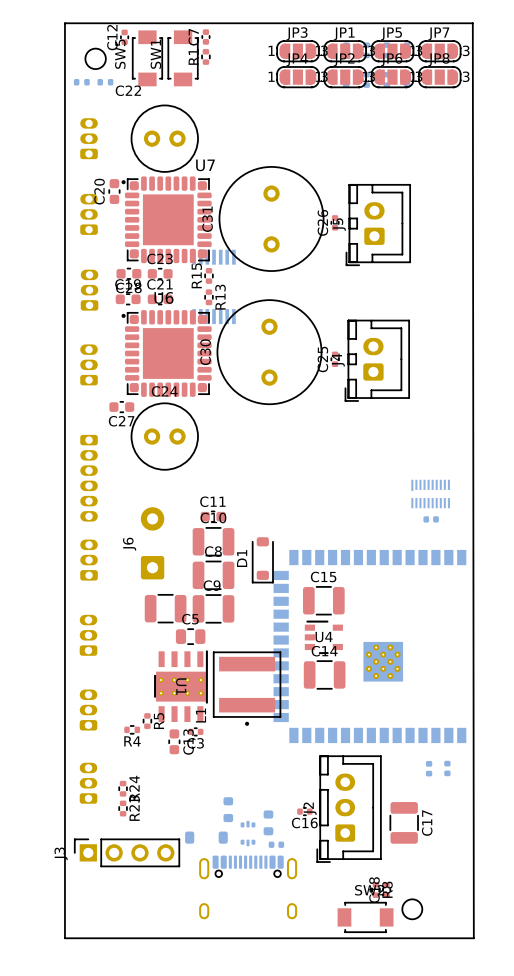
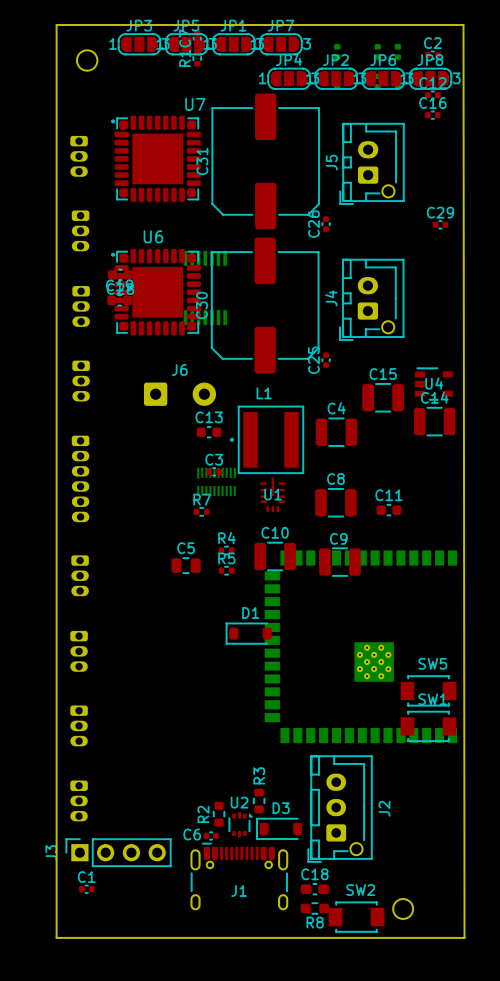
C12 rotation: 0° (124, 37) -> 90° clockwise (432, 95)
C12 position: (124, 37) -> (432, 95)
part: (366, 50) -> none
JP3 position: (297, 51) -> (139, 44)
JP1 position: (345, 51) -> (233, 44)
JP5 position: (392, 51) -> (186, 44)
JP7 position: (439, 51) -> (280, 44)
C2: none -> (432, 55)
SW5 rotation: 0° (147, 58) -> 90° clockwise (428, 690)
SW5 position: (147, 58) -> (428, 690)
SW1 rotation: 0° (183, 58) -> 90° clockwise (428, 726)
SW1 position: (183, 58) -> (428, 726)
part: (366, 79) -> none
part: (81, 82) -> none
part: (105, 82) -> none
part rotation: 0° (89, 138) -> 180° (79, 156)
C22: (164, 138) -> none
C31 footprint: [218, 166, 325, 272] -> [211, 93, 320, 230]
J5 footprint: [345, 184, 411, 266] -> [339, 123, 405, 205]
C20: (114, 191) -> none
part rotation: 0° (89, 214) -> 180° (80, 230)
U7 position: (166, 219) -> (155, 158)
C29: none -> (440, 224)
C23: (160, 273) -> none
R15: (208, 275) -> none
part rotation: 0° (89, 290) -> 180° (81, 306)
R13: (208, 297) -> none
C21: (160, 299) -> none
C30 footprint: [216, 299, 323, 405] -> [211, 237, 320, 374]
J4 footprint: [344, 319, 410, 402] -> [339, 259, 405, 341]
U6 position: (166, 353) -> (155, 292)
part rotation: 0° (89, 364) -> 180° (81, 381)
C27: (121, 407) -> none
C4: none -> (336, 432)
C24: (164, 436) -> none
part position: (430, 493) -> (216, 481)
R7: none -> (201, 511)
C11 position: (213, 516) -> (389, 510)
part: (431, 519) -> none
C10 position: (213, 541) -> (275, 556)
J6 rotation: 0° (152, 543) -> 90° clockwise (180, 394)
J6 position: (152, 543) -> (180, 394)
part rotation: 0° (89, 560) -> 180° (80, 575)
D1 rotation: 0° (262, 560) -> 90° clockwise (248, 633)
D1 position: (262, 560) -> (248, 633)
C8 position: (213, 575) -> (335, 502)
C15 position: (323, 600) -> (383, 397)
part: (165, 608) -> none
C9 position: (213, 608) -> (340, 562)
part rotation: 0° (88, 635) -> 180° (79, 651)
C5 position: (190, 636) -> (186, 565)
U4 position: (323, 637) -> (433, 384)
U1 footprint: [154, 650, 208, 722] -> [260, 477, 285, 513]
C14 position: (324, 674) -> (434, 421)
L1 rotation: 0° (247, 688) -> 90° clockwise (266, 439)
L1 position: (247, 688) -> (266, 439)
part rotation: 0° (88, 710) -> 180° (79, 725)
L1 name position: L1 (200, 715) -> L1 (264, 393)
R5 rotation: 0° (147, 721) -> 90° clockwise (226, 570)
R5 position: (147, 721) -> (226, 570)
R4 position: (132, 729) -> (226, 550)
C3 position: (195, 731) -> (214, 471)
R4 name position: R4 (132, 741) -> R4 (227, 538)
C13 rotation: 0° (174, 741) -> 90° clockwise (209, 432)
C13 position: (174, 741) -> (209, 432)
C13 name position: C13 (188, 741) -> C13 (209, 417)
C3 name position: C3 (195, 743) -> C3 (214, 459)
J2 footprint: [316, 755, 382, 863] -> [307, 755, 373, 863]
part: (429, 768) -> none
part: (447, 768) -> none
part rotation: 0° (88, 783) -> 180° (79, 800)
R24: (123, 788) -> none
R23: (123, 808) -> none
J2 name position: J2 (310, 808) -> J2 (384, 808)
R3 side: bottom (228, 809) -> top (259, 800)
C16 position: (304, 811) -> (432, 115)
R2 side: bottom (268, 822) -> top (219, 814)
C17: (404, 822) -> none
C16 name position: C16 (304, 823) -> C16 (432, 103)
U2 side: bottom (248, 833) -> top (240, 824)
D3 side: bottom (206, 837) -> top (279, 828)
C6 side: bottom (276, 844) -> top (211, 835)
R8 footprint: [371, 882, 381, 898] -> [300, 902, 330, 915]
C18 footprint: [382, 882, 391, 898] -> [300, 883, 330, 895]
J1 side: bottom (248, 887) -> top (239, 876)
C1: none -> (86, 889)

